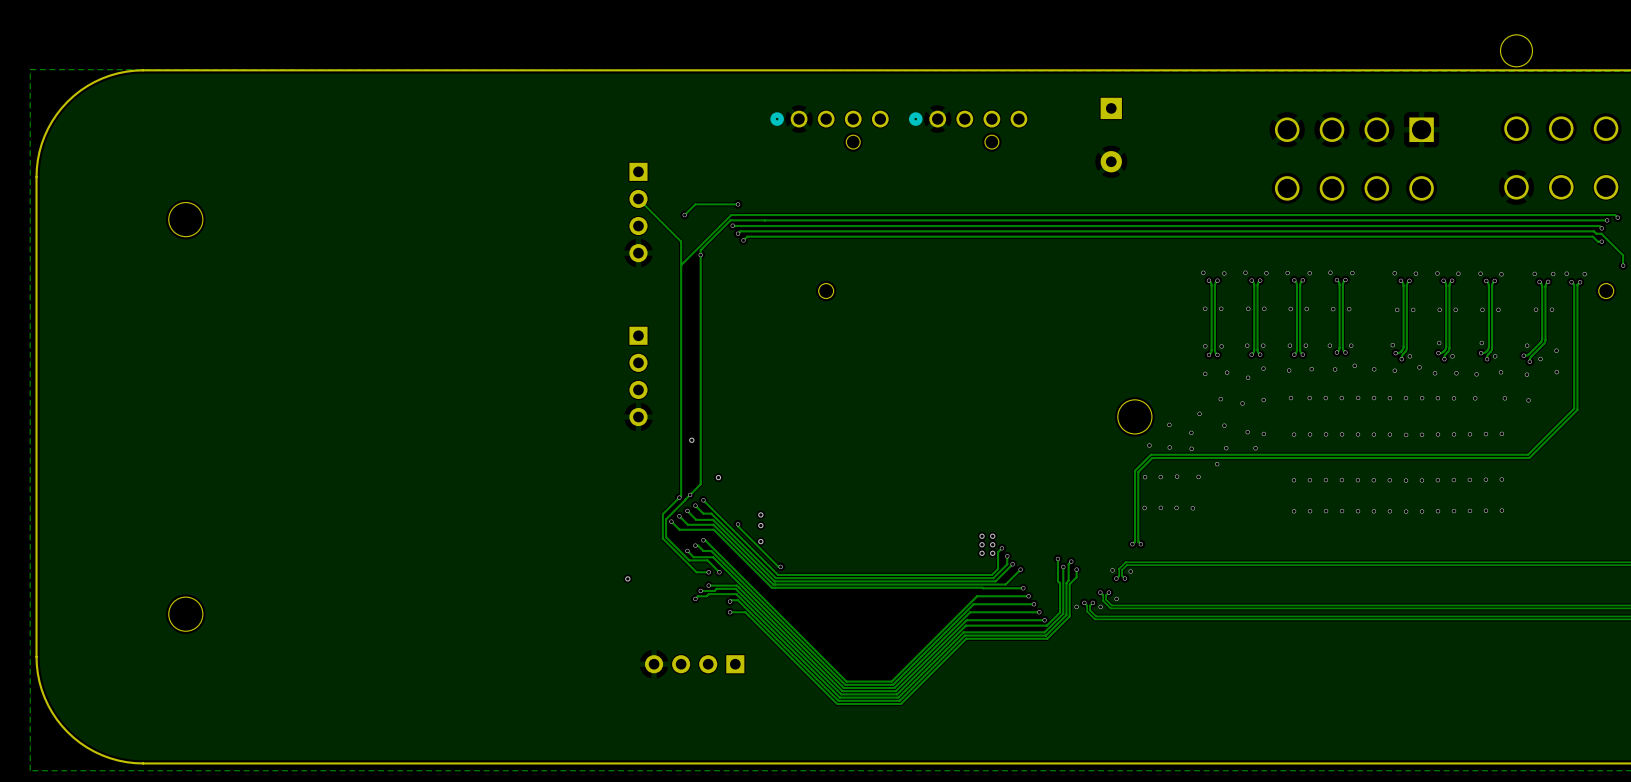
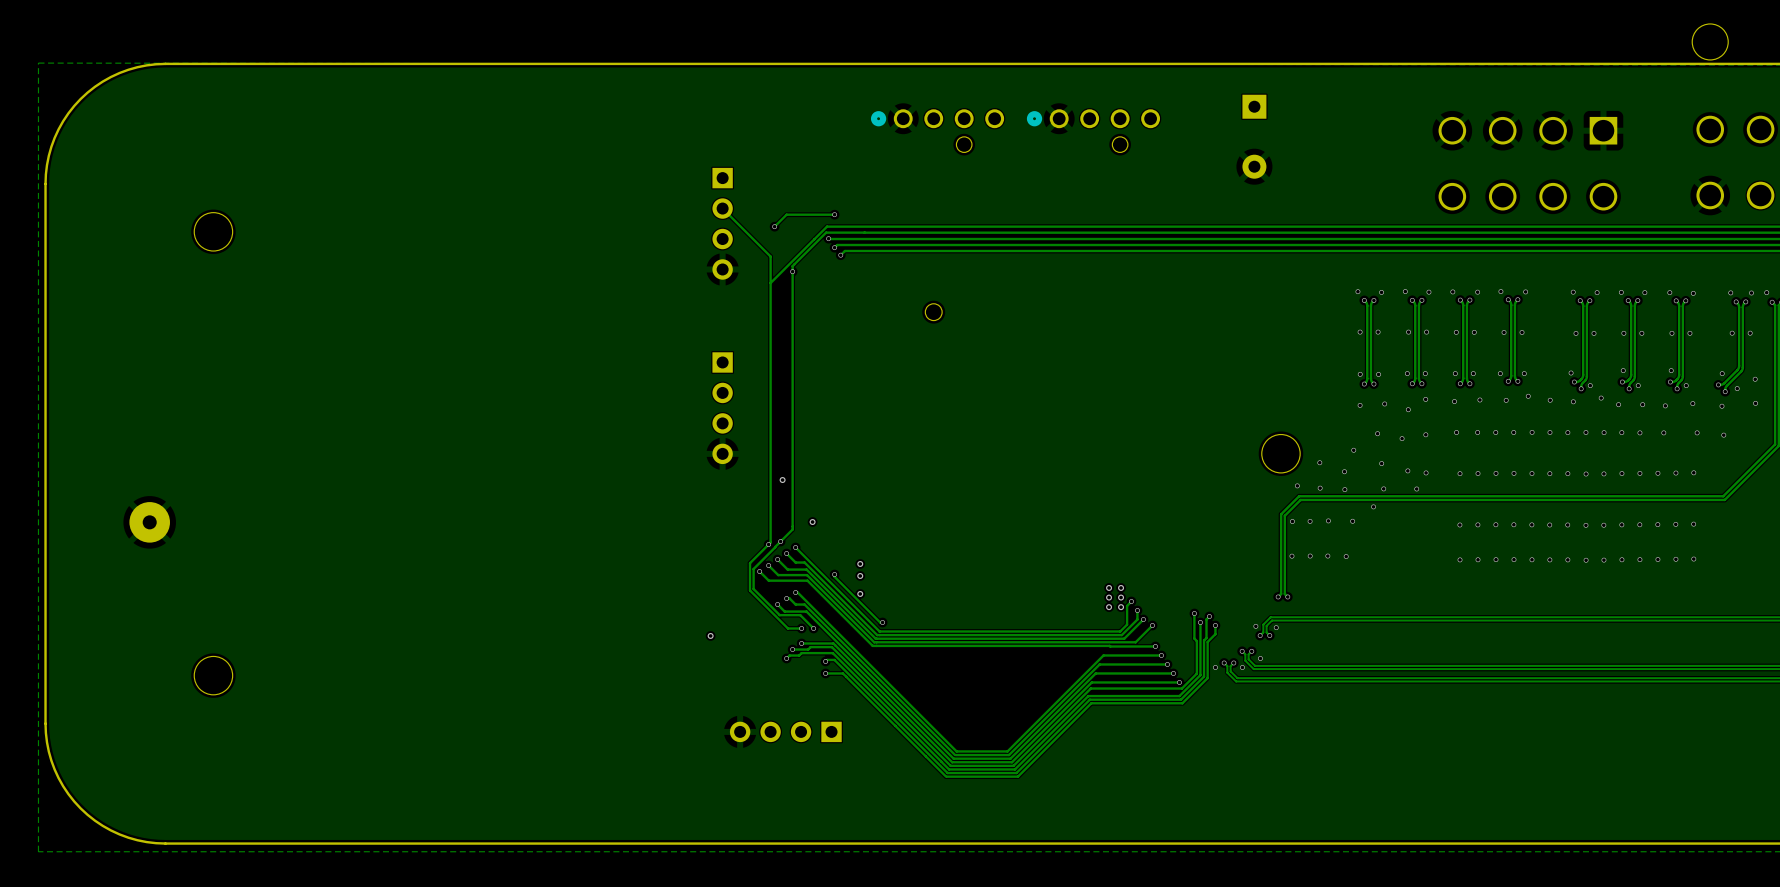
part: none -> (149, 522)

